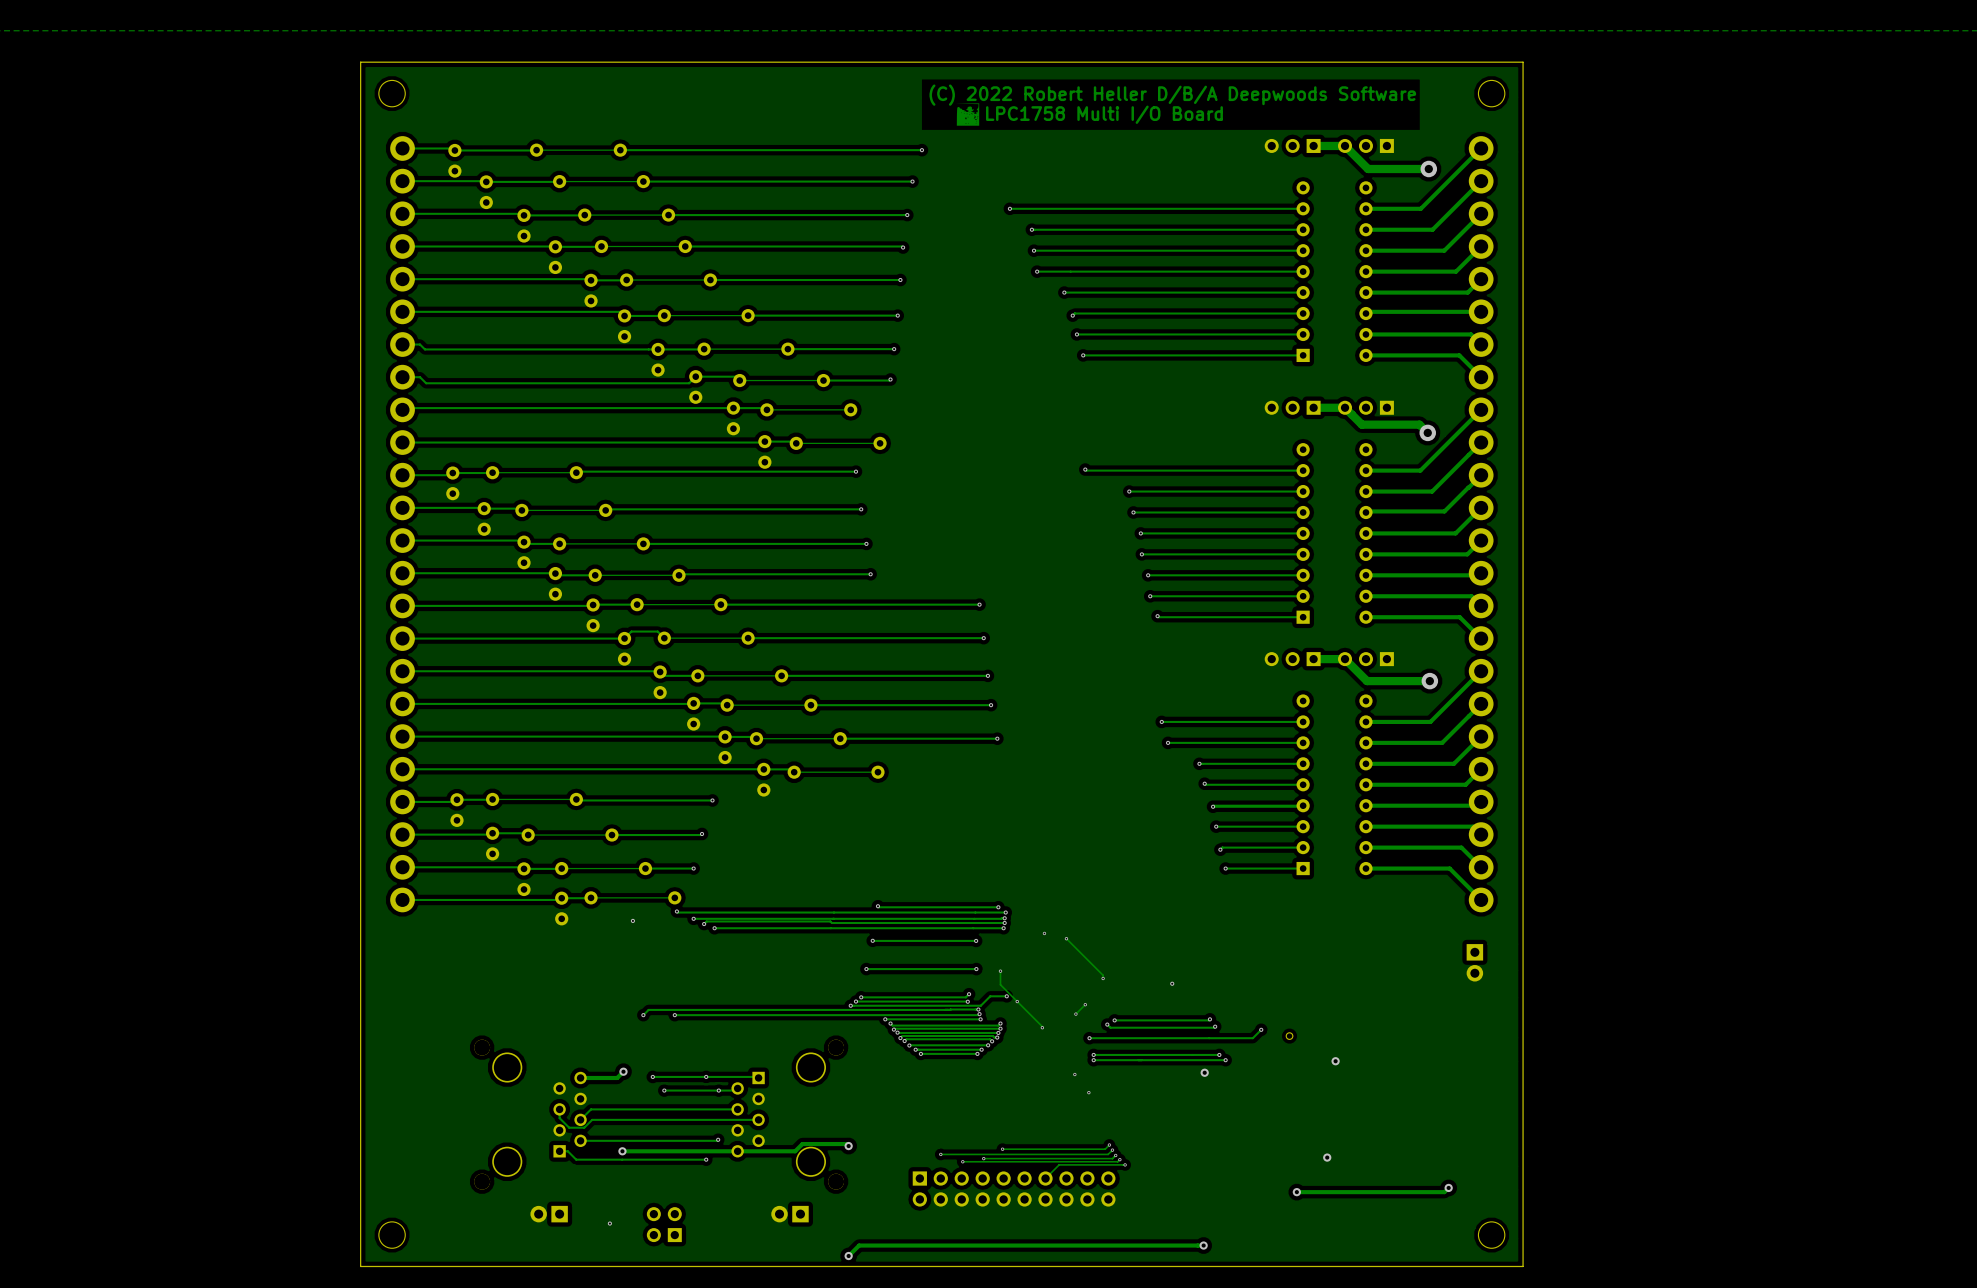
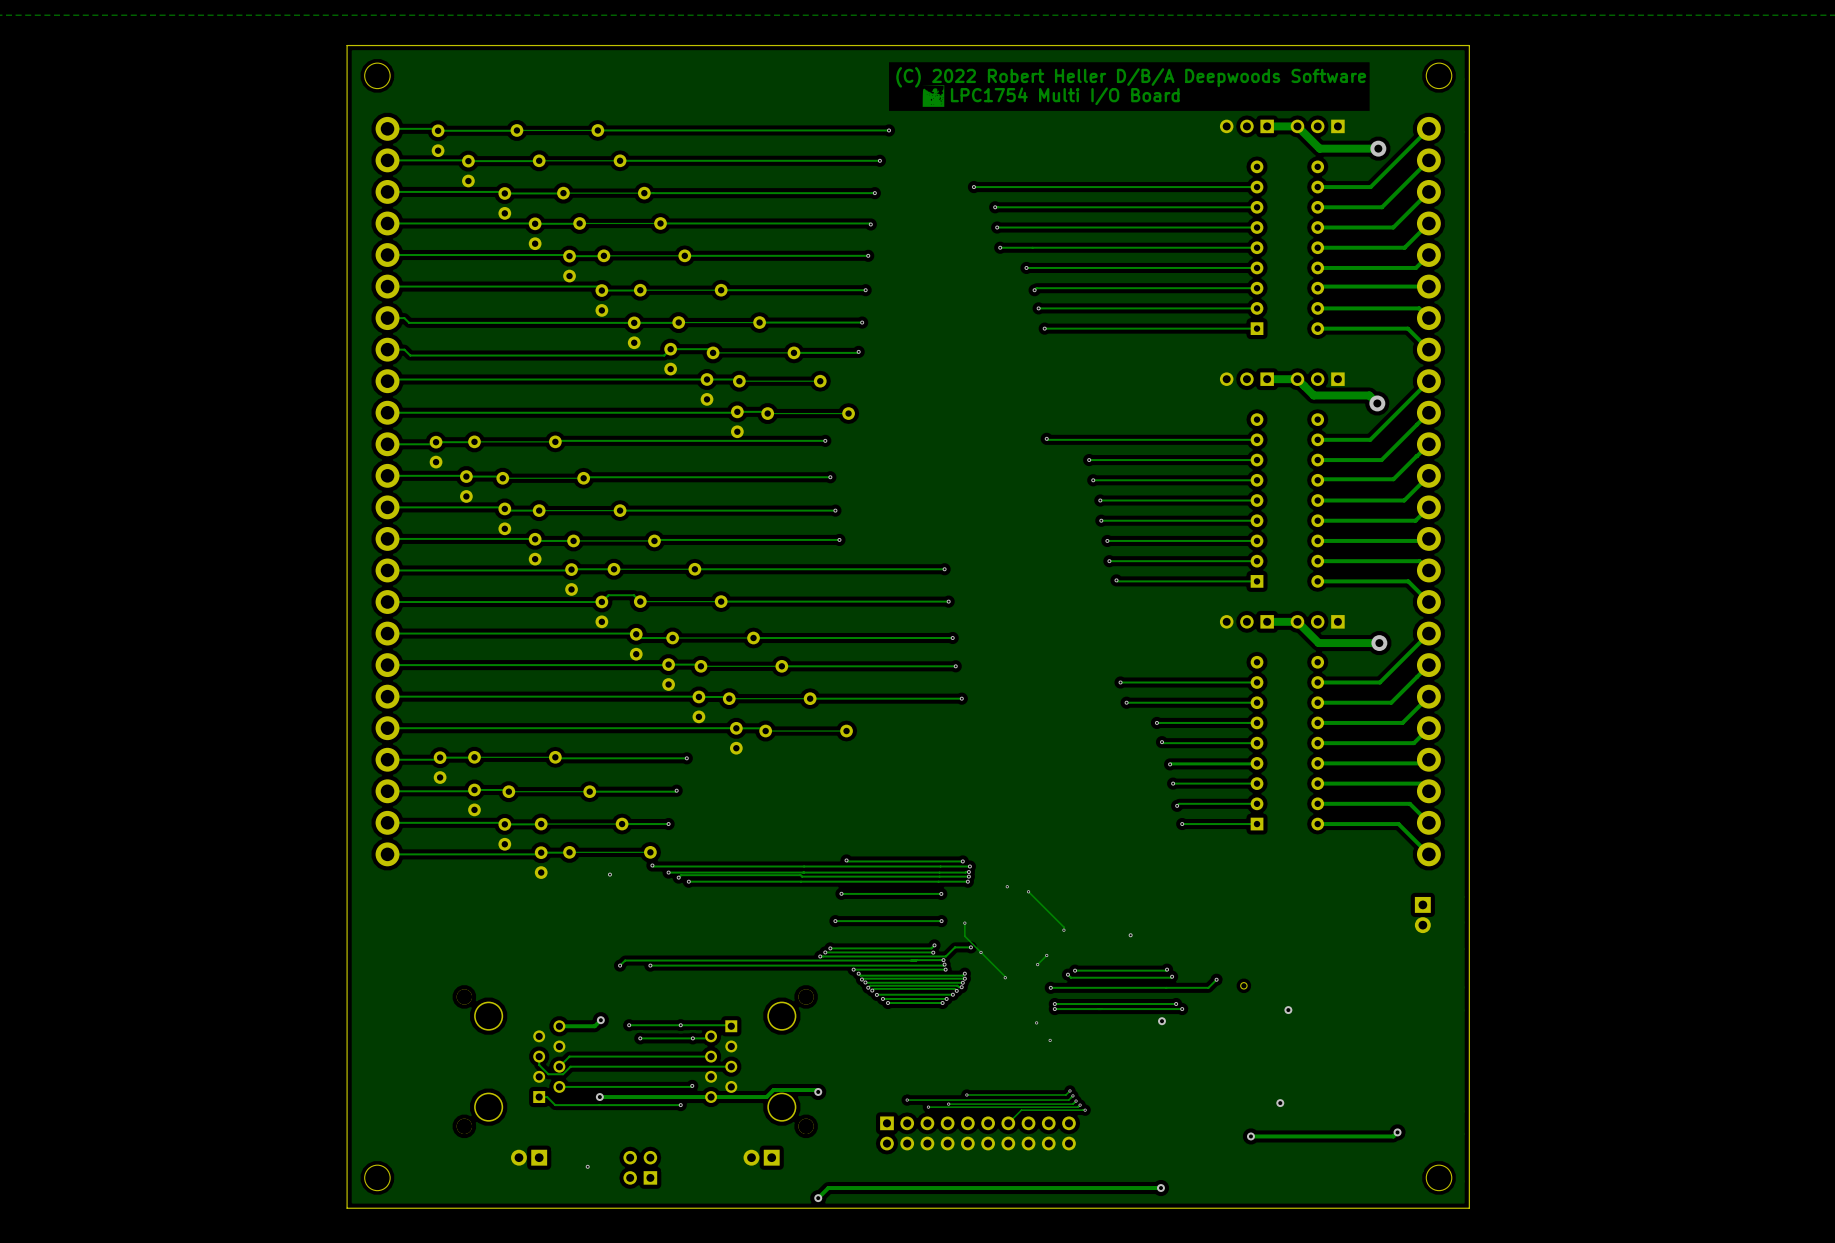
text: LPC1758 Multi I/O Board (1104, 114) -> LPC1754 Multi I/O Board (1065, 96)

